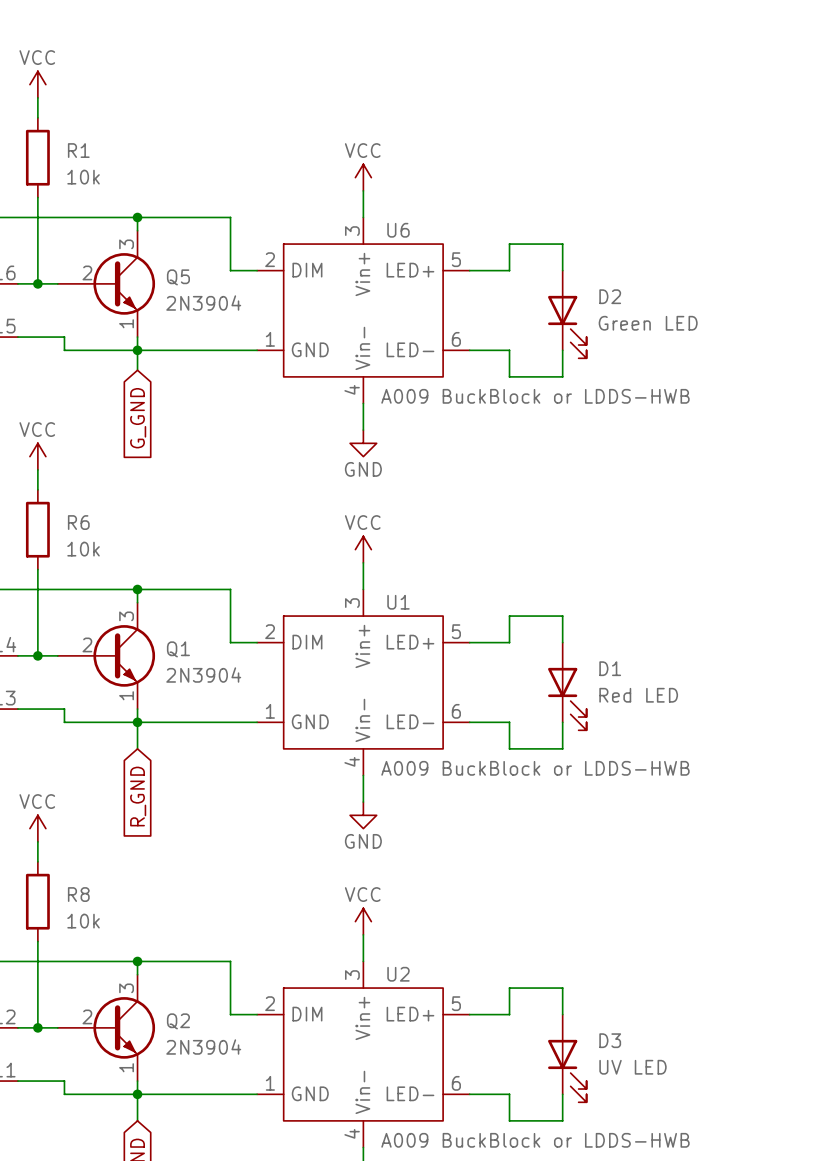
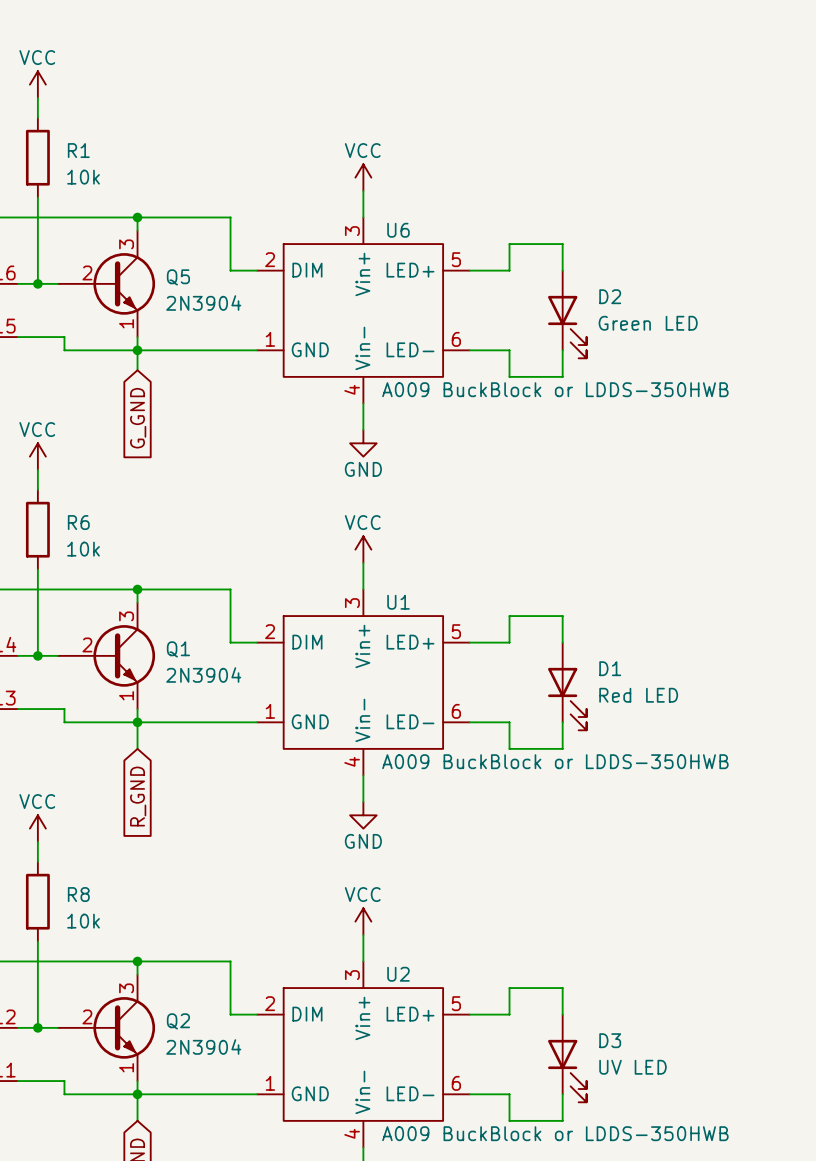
U6 value: A009 BuckBlock or LDDS-HWB (535, 396) -> A009 BuckBlock or LDDS-350HWB (555, 389)
U1 value: A009 BuckBlock or LDDS-HWB (535, 768) -> A009 BuckBlock or LDDS-350HWB (555, 761)
U2 value: A009 BuckBlock or LDDS-HWB (535, 1140) -> A009 BuckBlock or LDDS-350HWB (555, 1133)

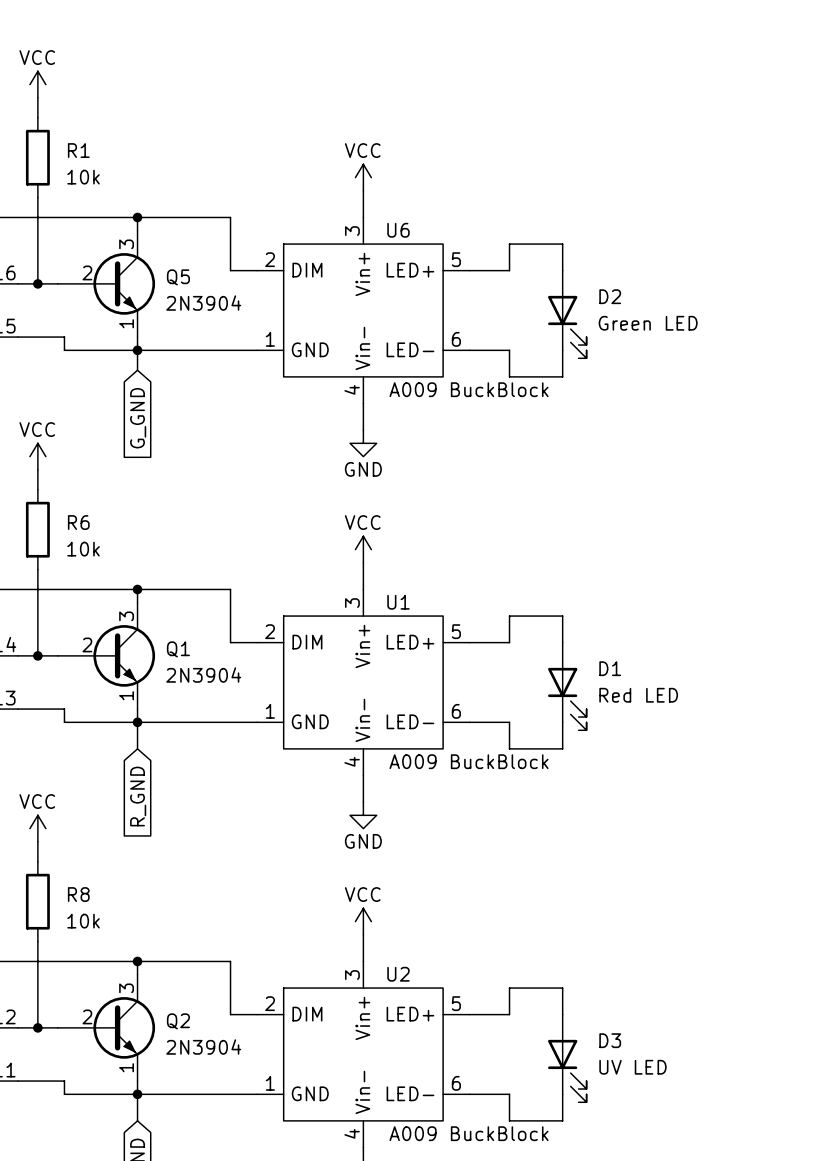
U6 value: A009 BuckBlock or LDDS-350HWB (555, 389) -> A009 BuckBlock (469, 389)
U1 value: A009 BuckBlock or LDDS-350HWB (555, 761) -> A009 BuckBlock (469, 761)
U2 value: A009 BuckBlock or LDDS-350HWB (555, 1133) -> A009 BuckBlock (469, 1133)

